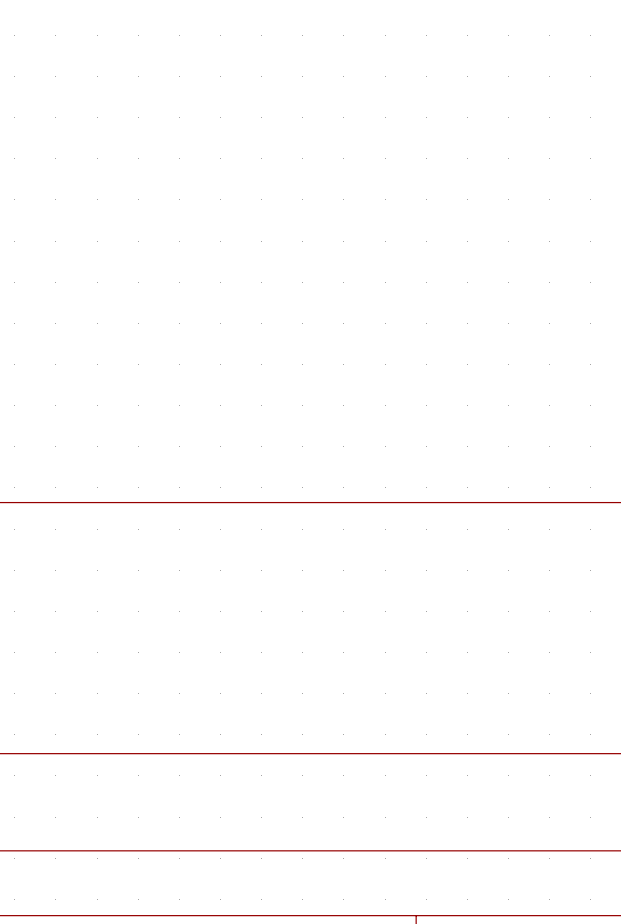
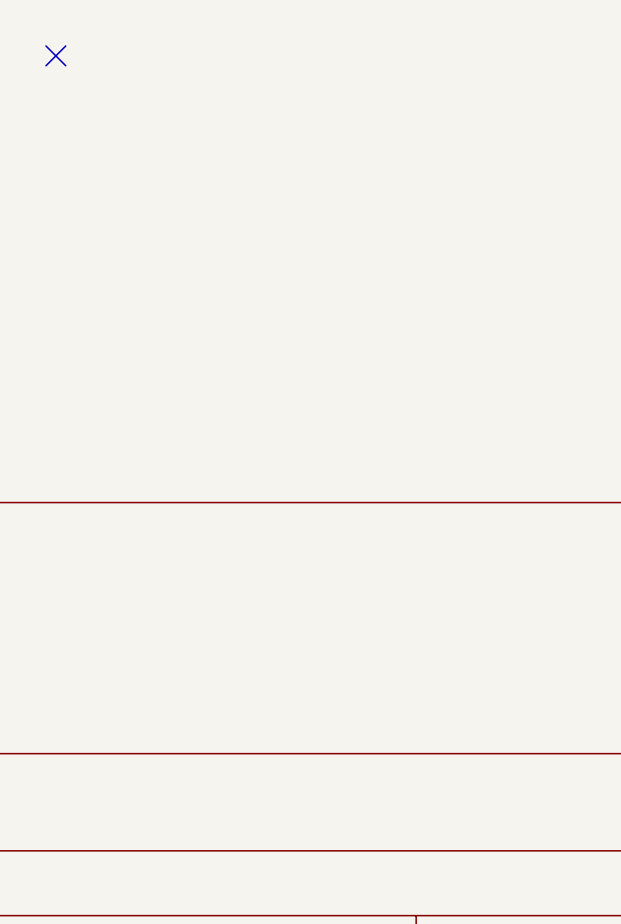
no-connect mark: none -> (55, 55)

